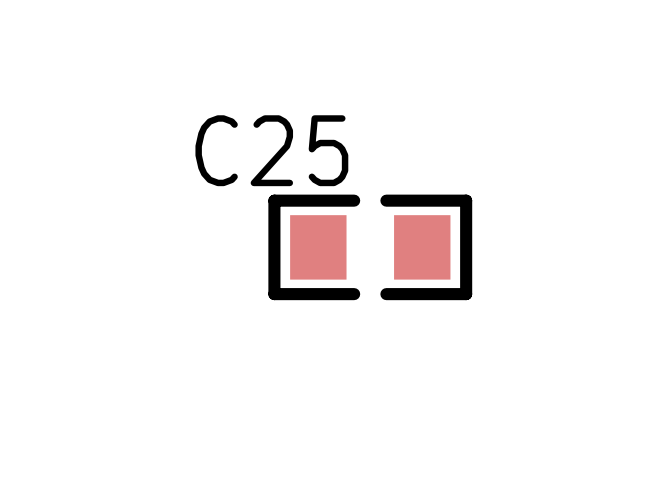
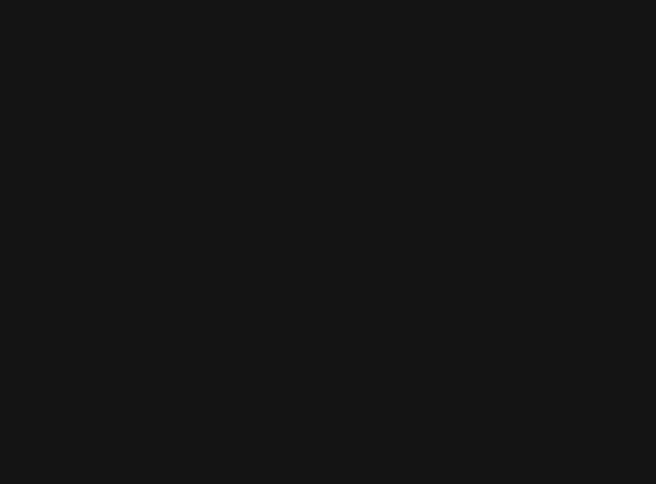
C25: (370, 247) -> none

